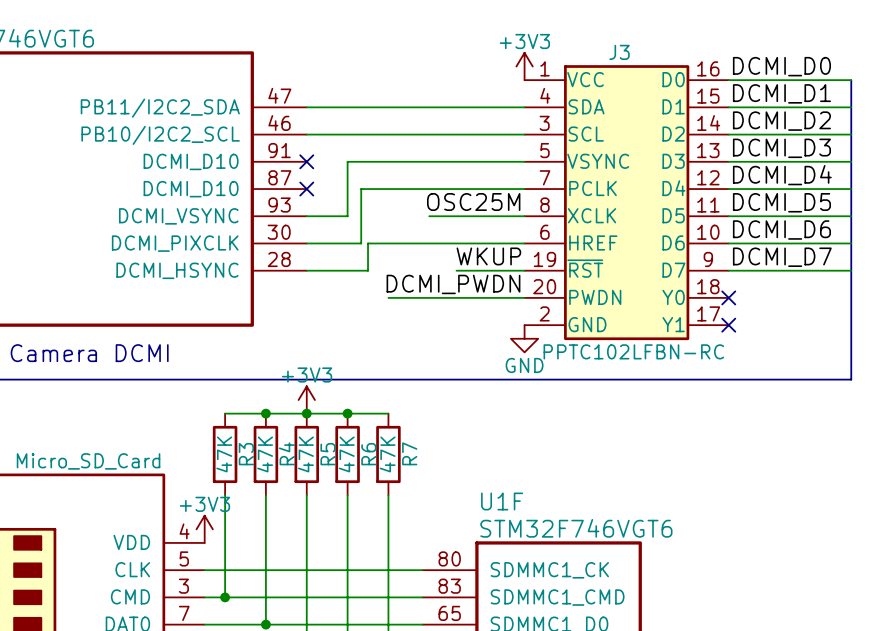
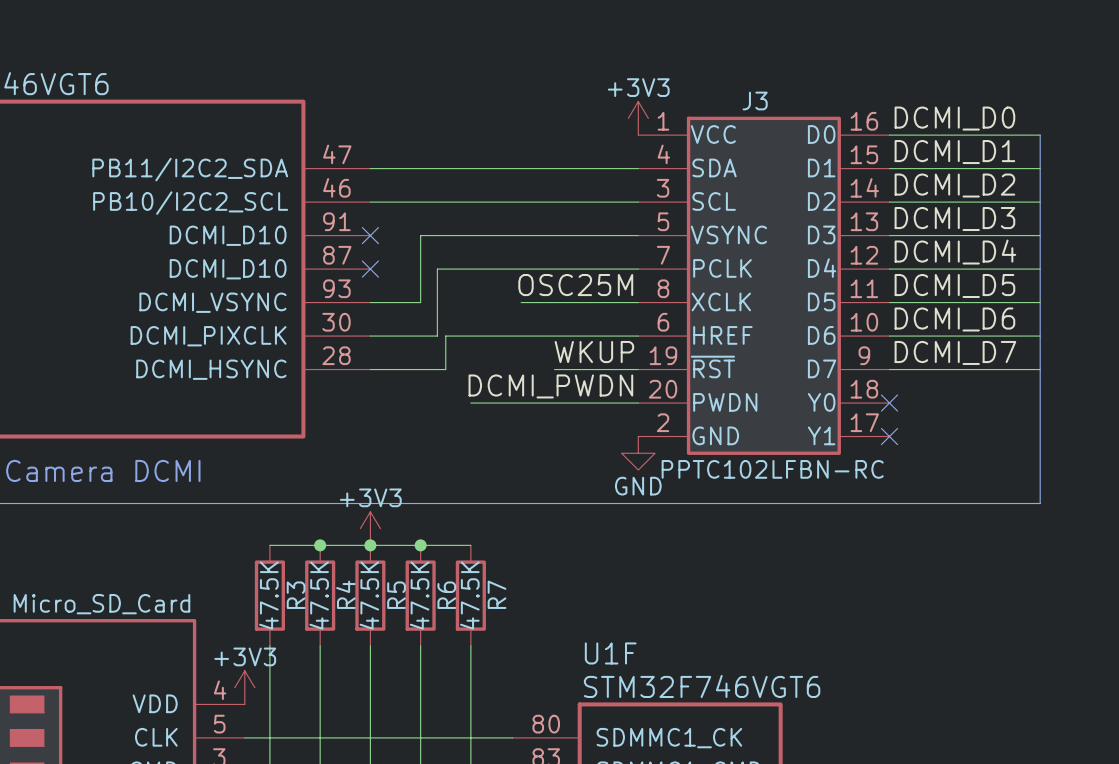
R3 value: 47K (224, 454) -> 47.5K (268, 595)
R4 value: 47K (265, 454) -> 47.5K (319, 595)
R5 value: 47K (305, 454) -> 47.5K (369, 595)
R6 value: 47K (346, 454) -> 47.5K (419, 595)
R7 value: 47K (387, 454) -> 47.5K (469, 595)

